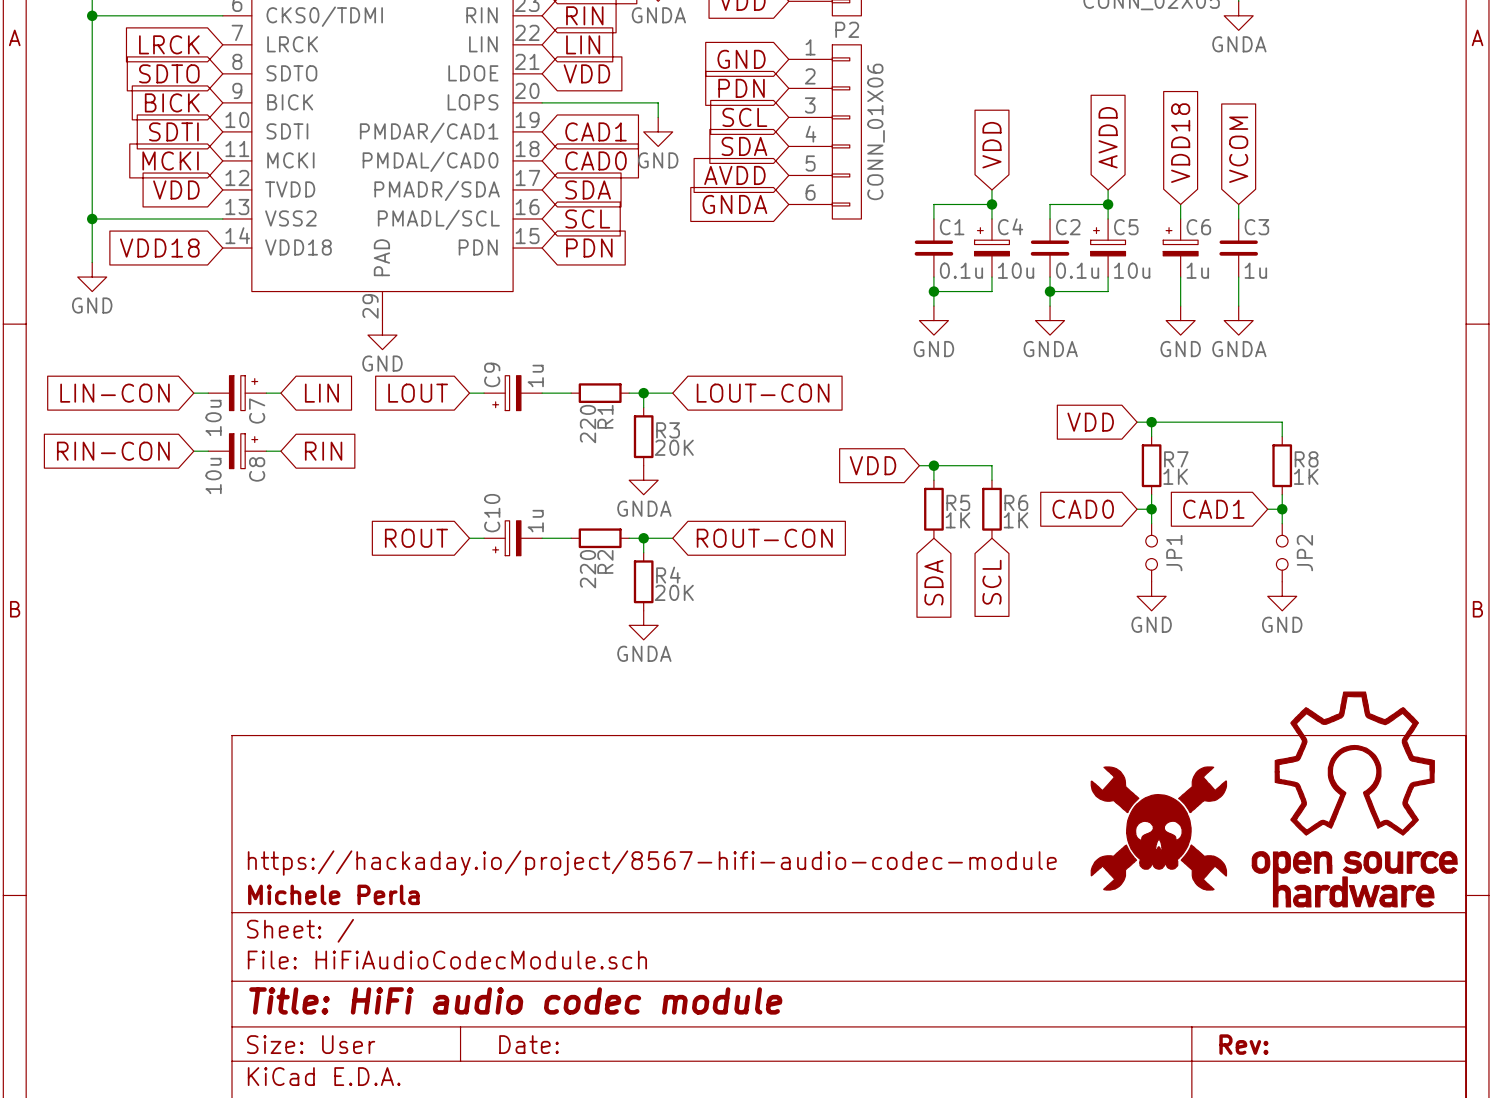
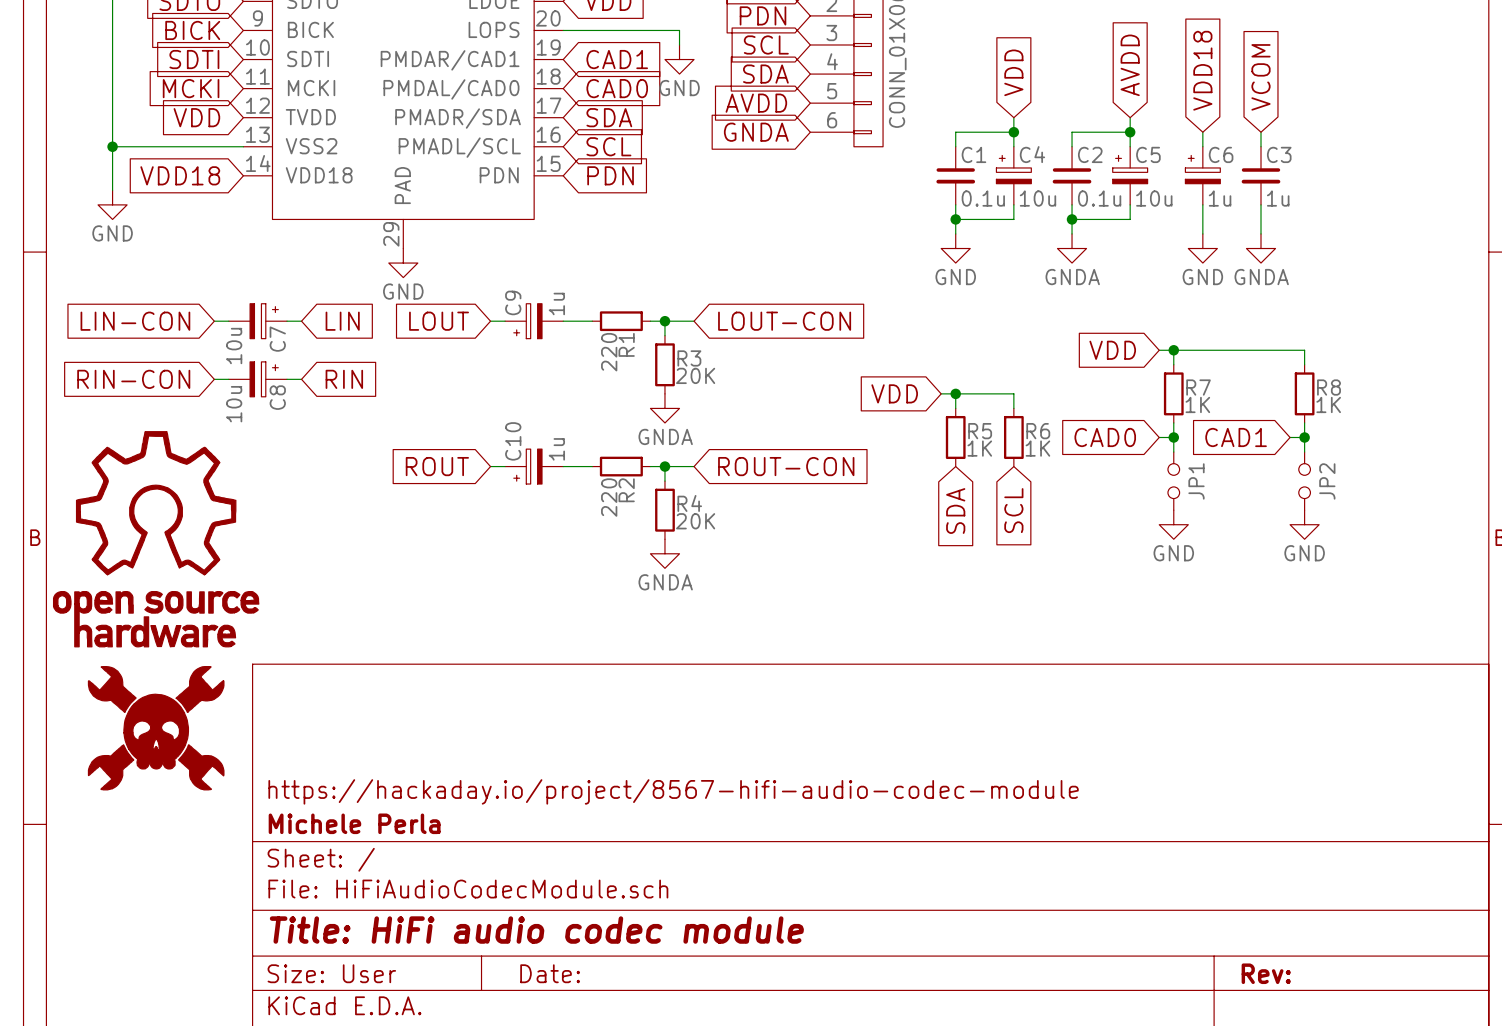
part: none -> (156, 539)
part: none -> (156, 728)
part: (1354, 799) -> none
part: (1158, 828) -> none

